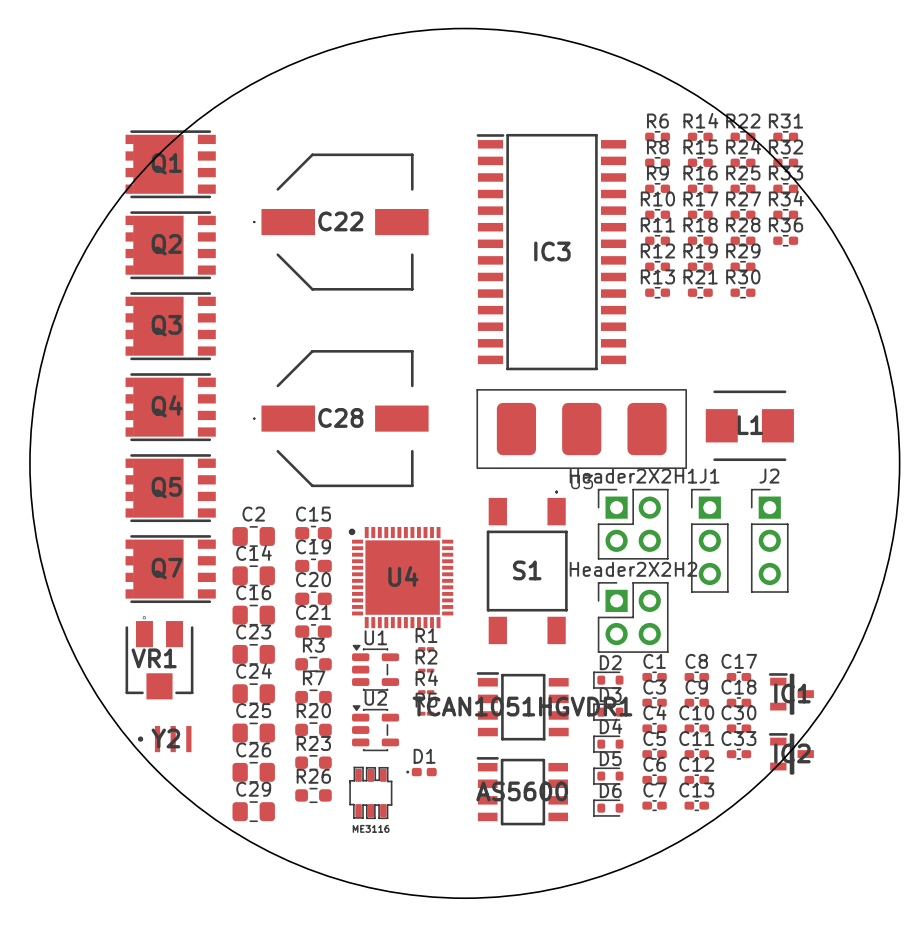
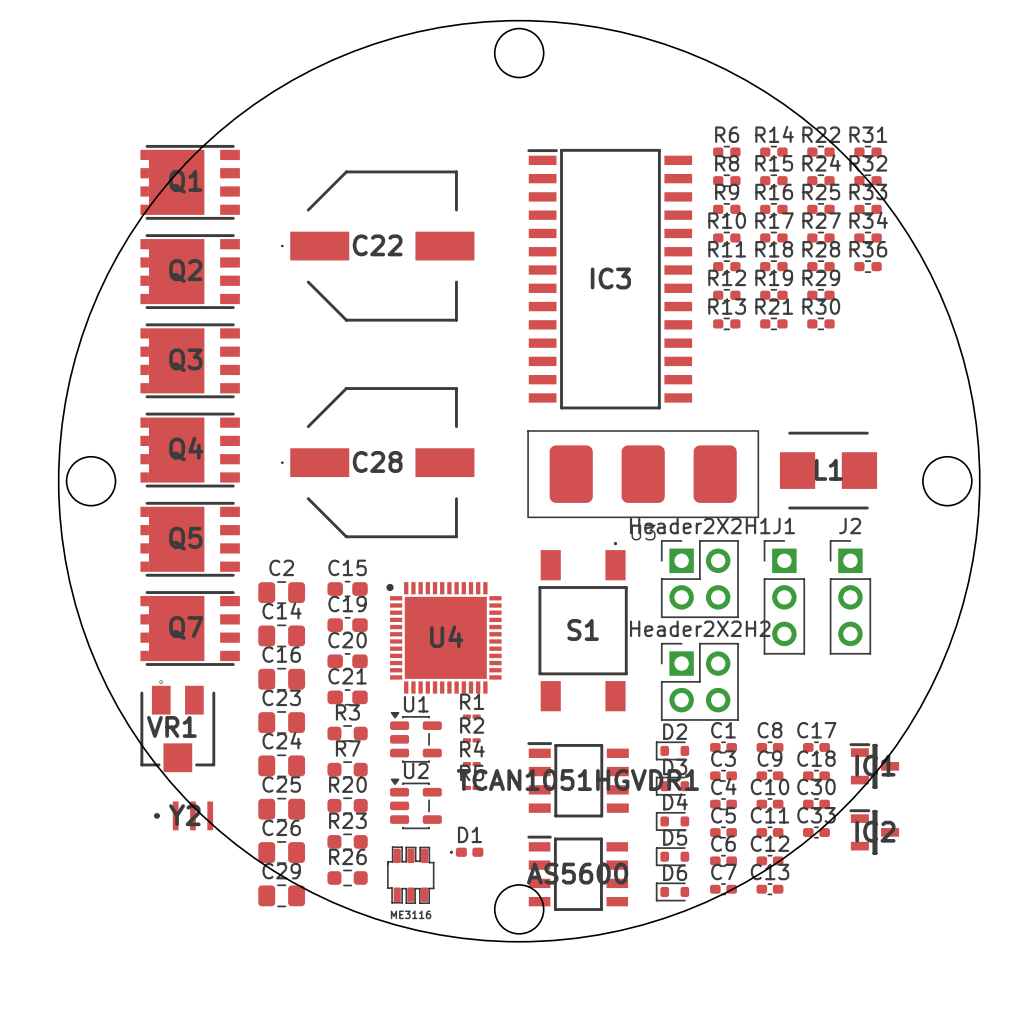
round board edge: none -> [58, 20, 981, 943]
round board edge: none -> [494, 28, 545, 78]
round board edge: [29, 28, 900, 899] -> none
round board edge: none -> [66, 456, 116, 507]
round board edge: none -> [922, 456, 973, 507]
round board edge: none -> [494, 884, 545, 935]

